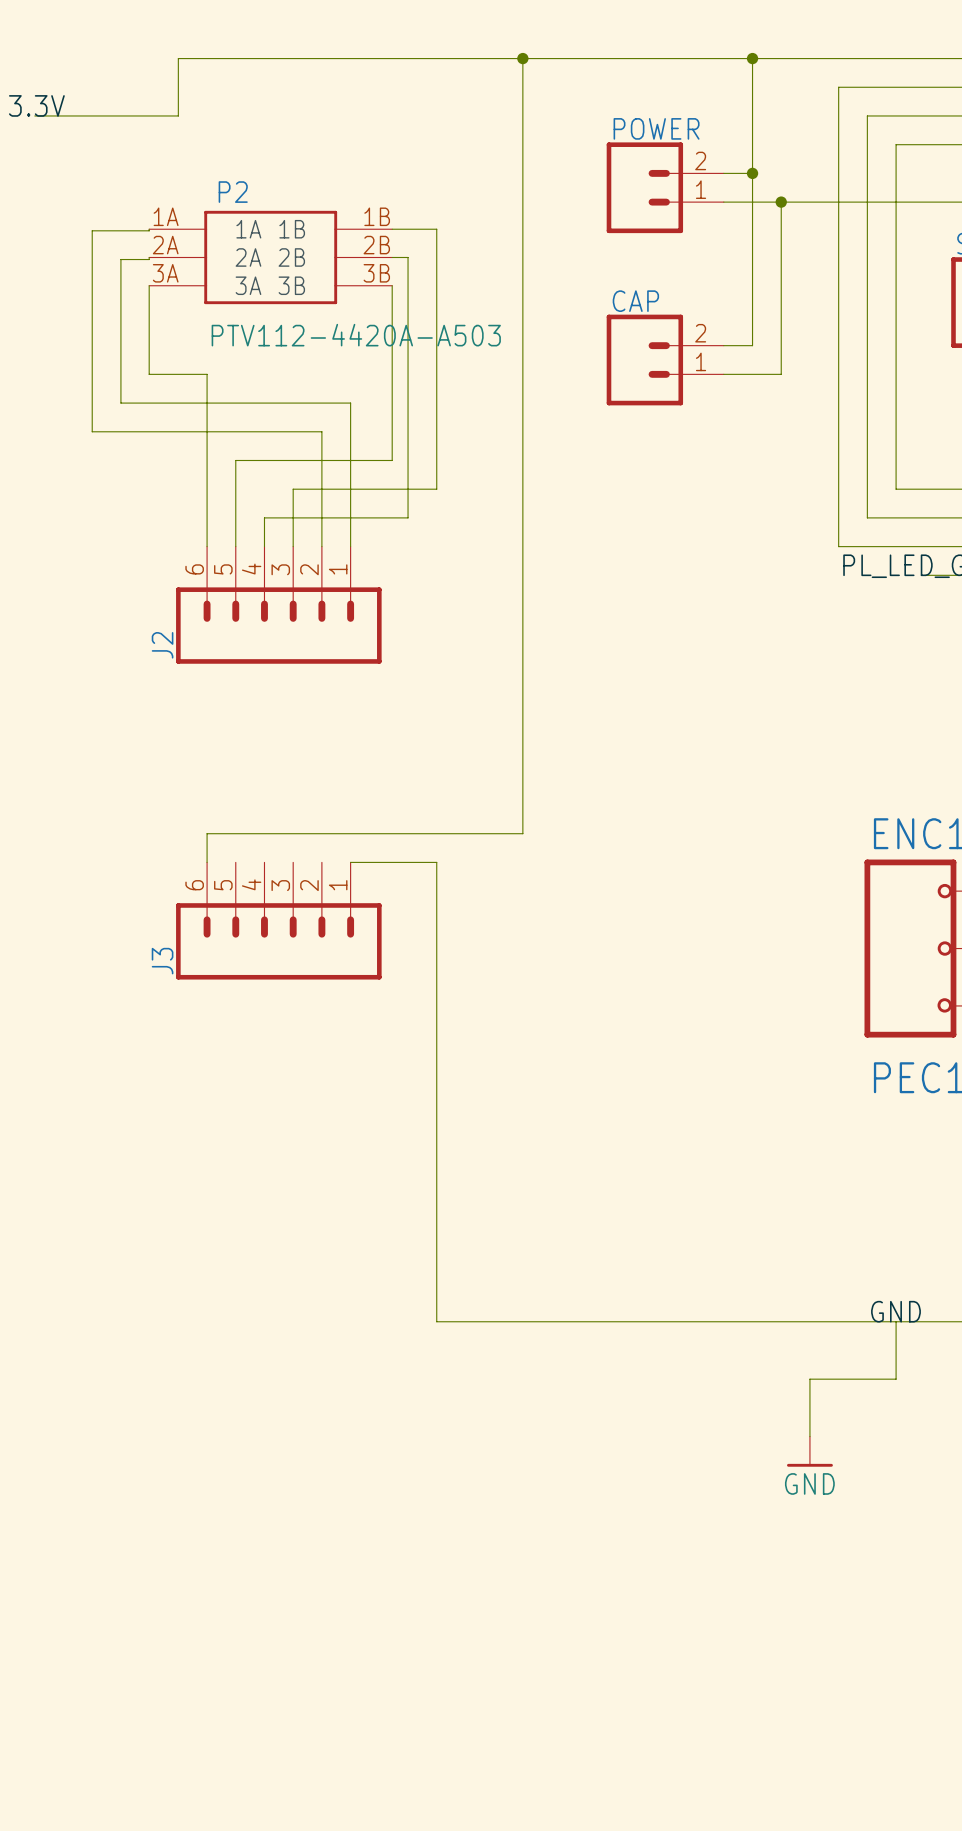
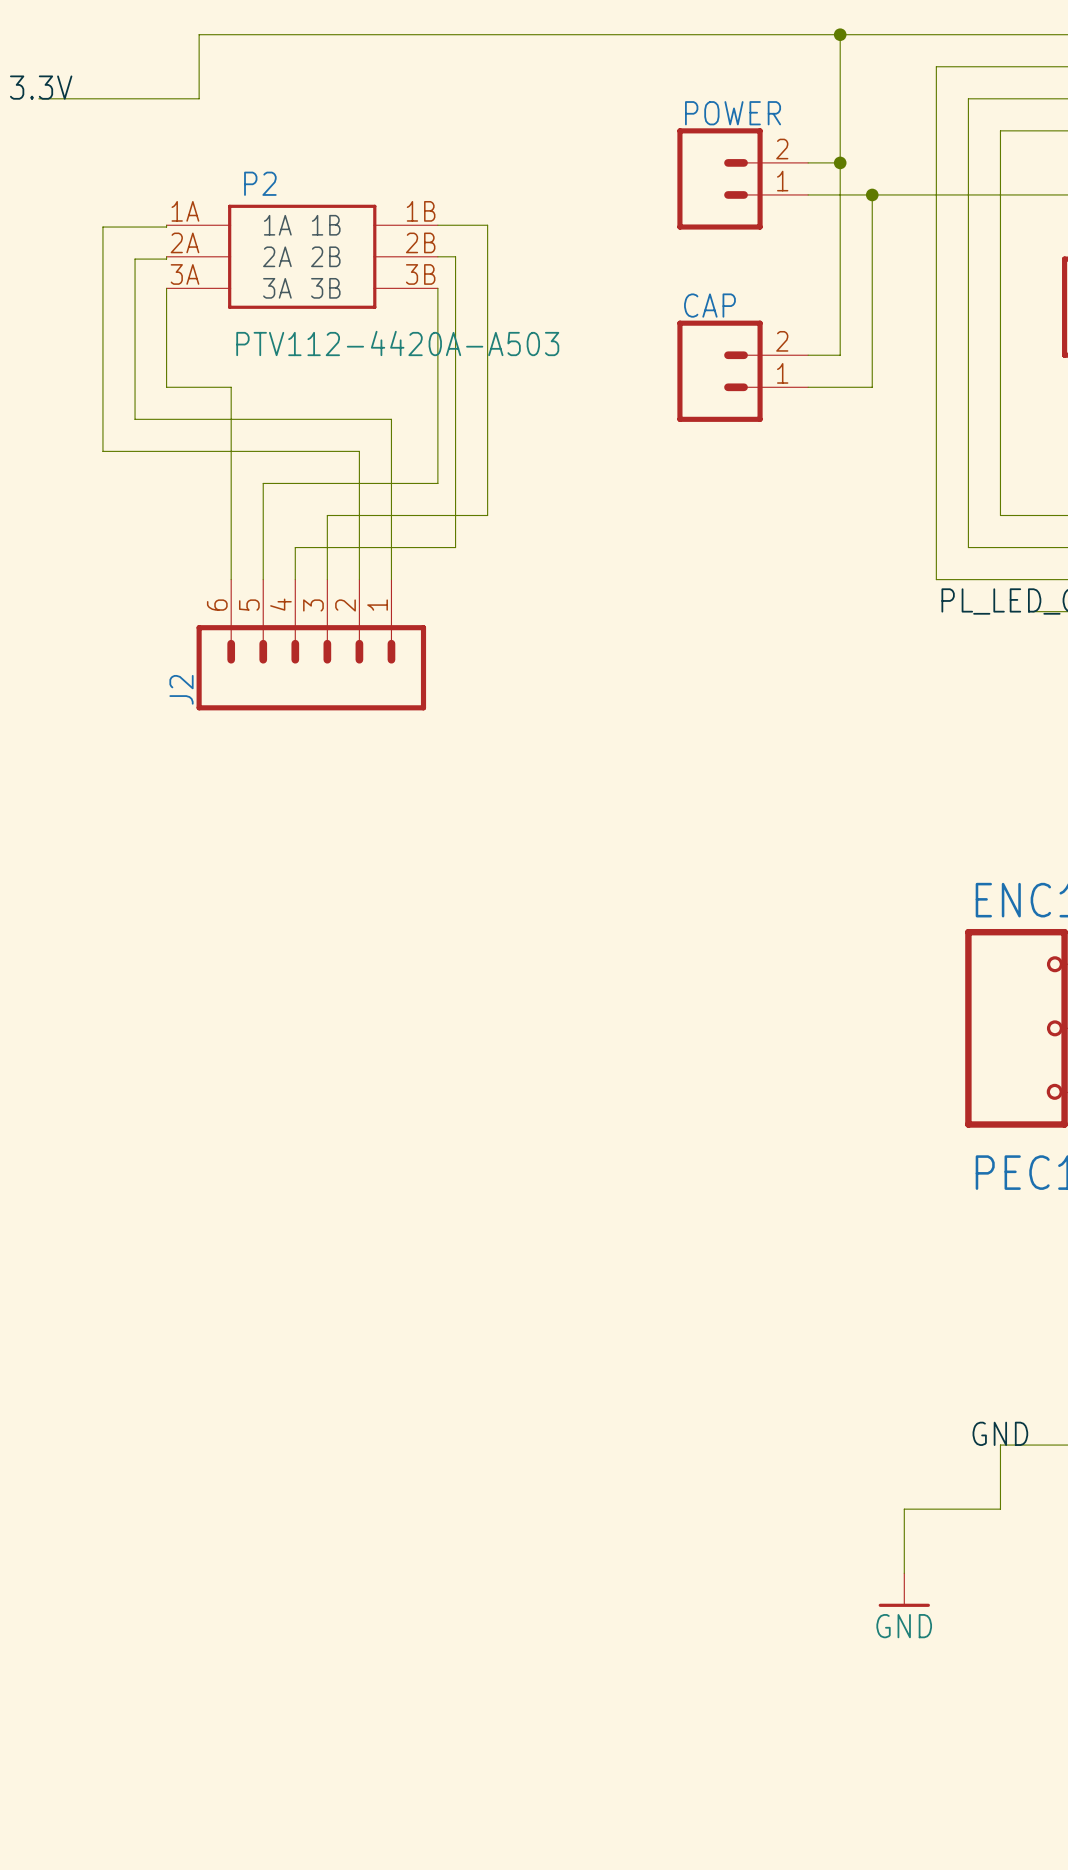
wire: (522, 58) (522, 833) (207, 833) (207, 862) -> none
junction: (522, 58) -> none
wire: (350, 862) (436, 862) (436, 1321) (896, 1321) -> none
J3: (278, 920) -> none

